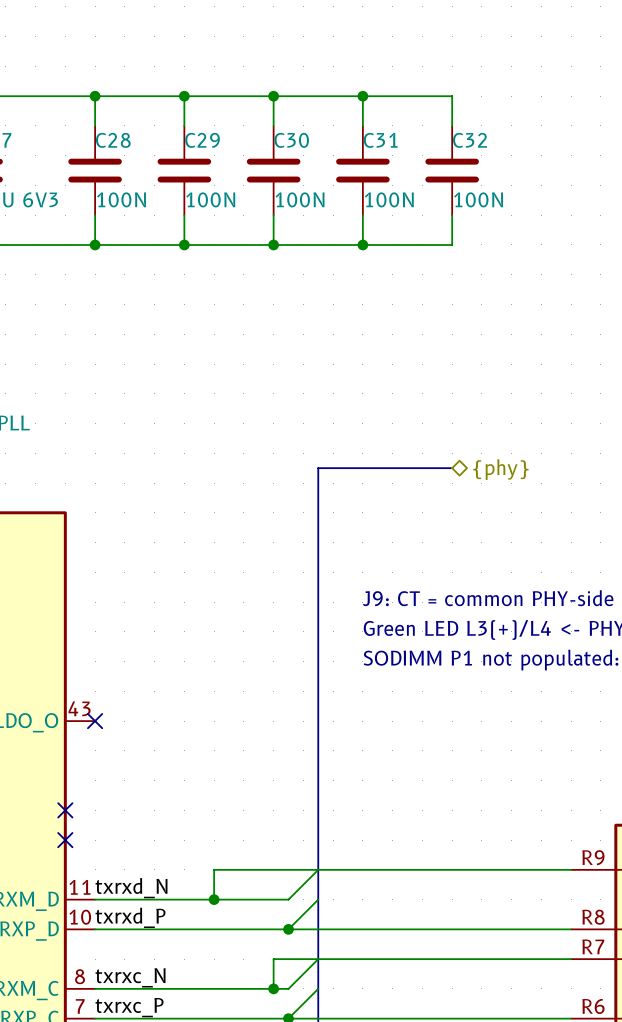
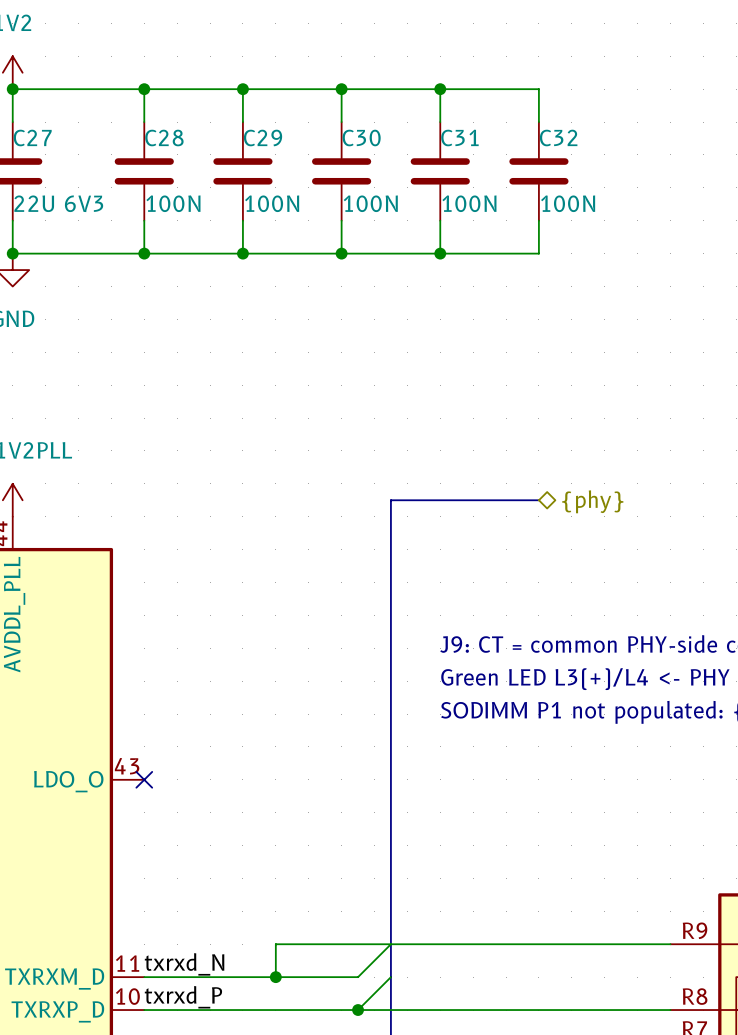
no-connect mark: (65, 810) -> none
no-connect mark: (65, 840) -> none

